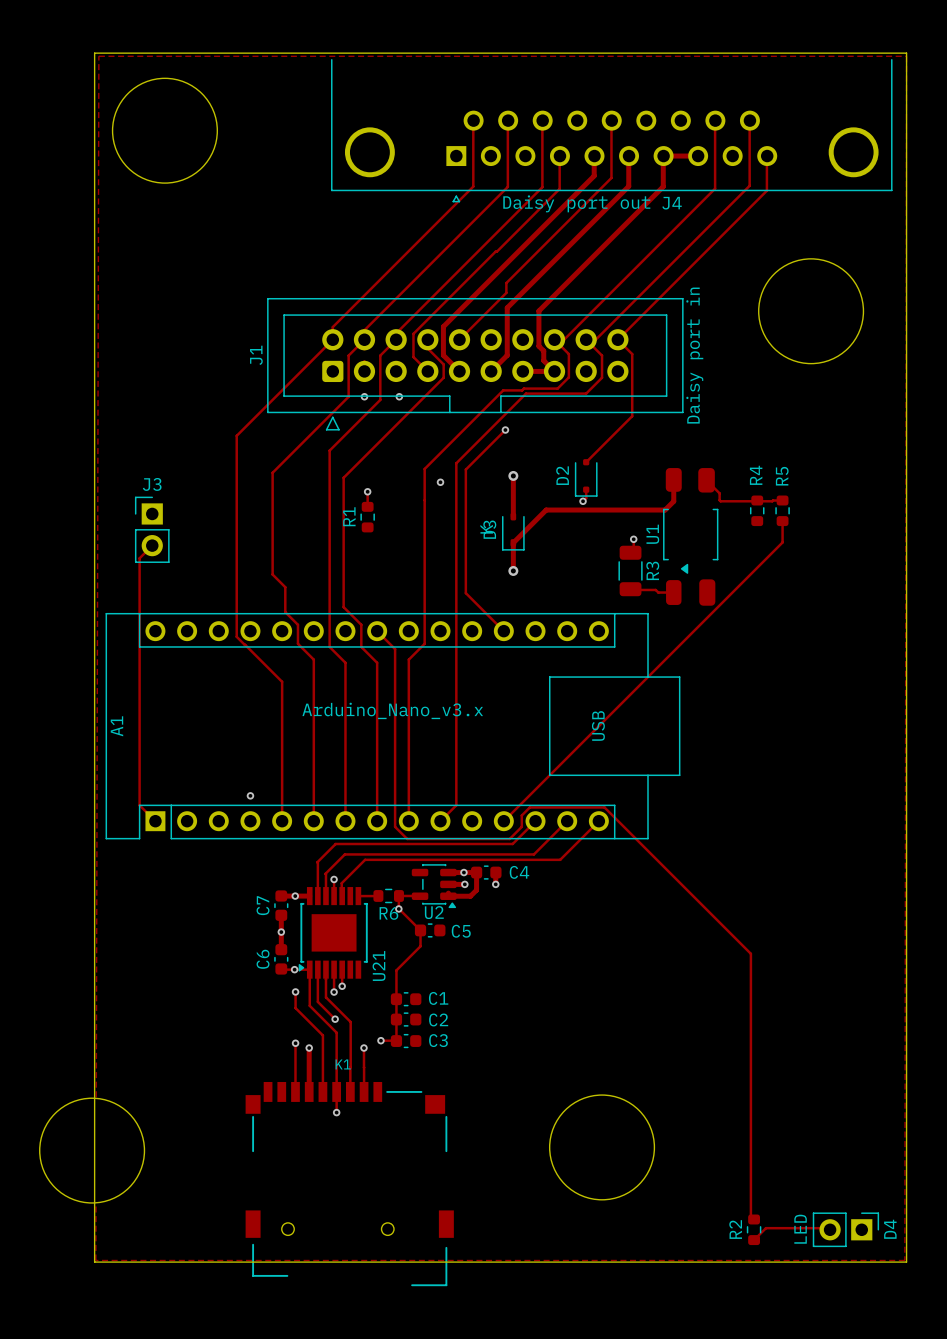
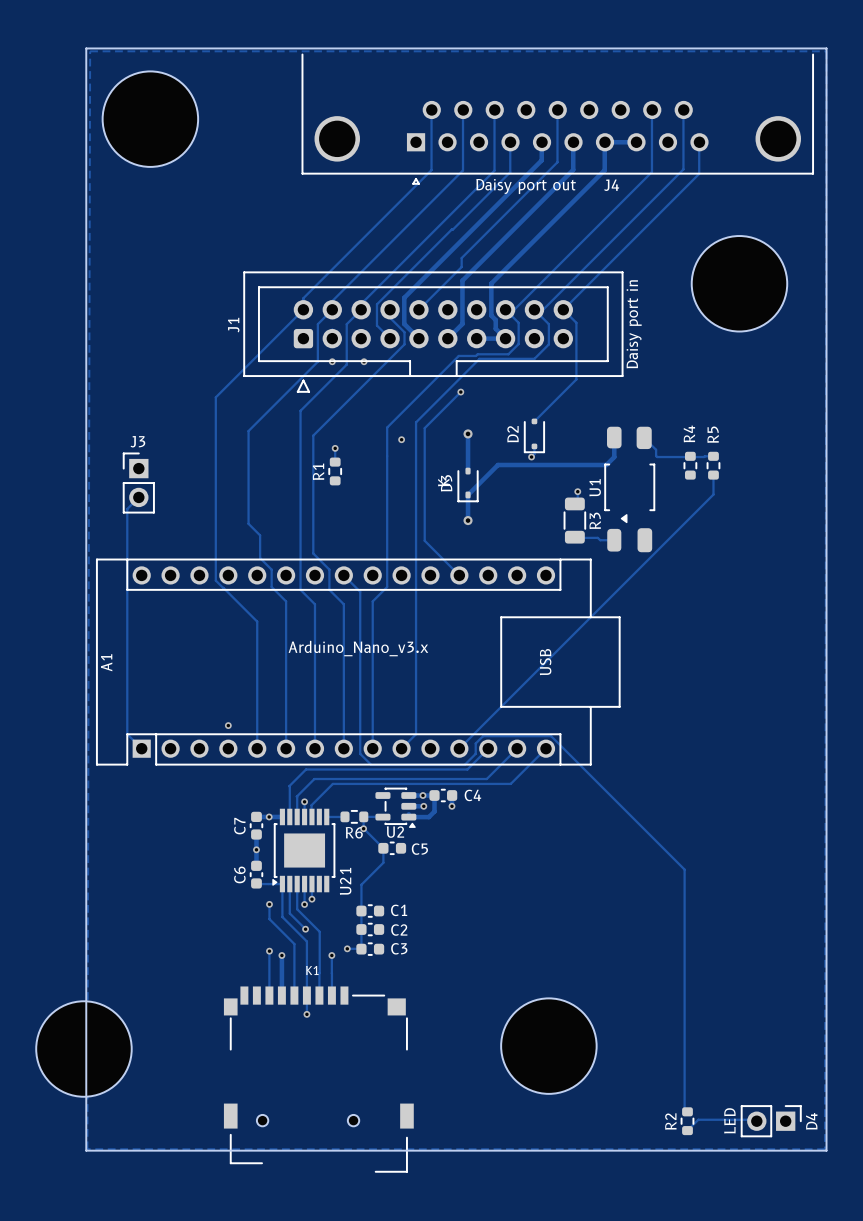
via: (294, 969) -> none

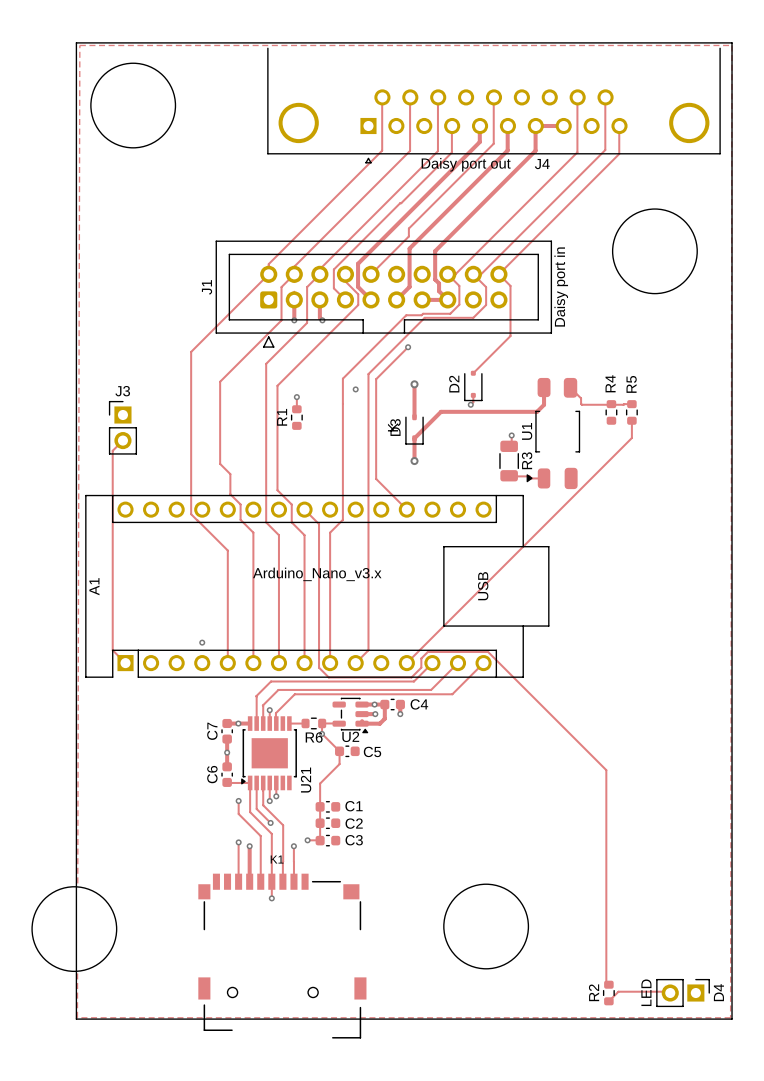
track: none -> (294, 299) (294, 320)
track: none -> (319, 299) (319, 317) (322, 320)
U1 footprint: [604, 426, 655, 553] -> [526, 377, 581, 490]

